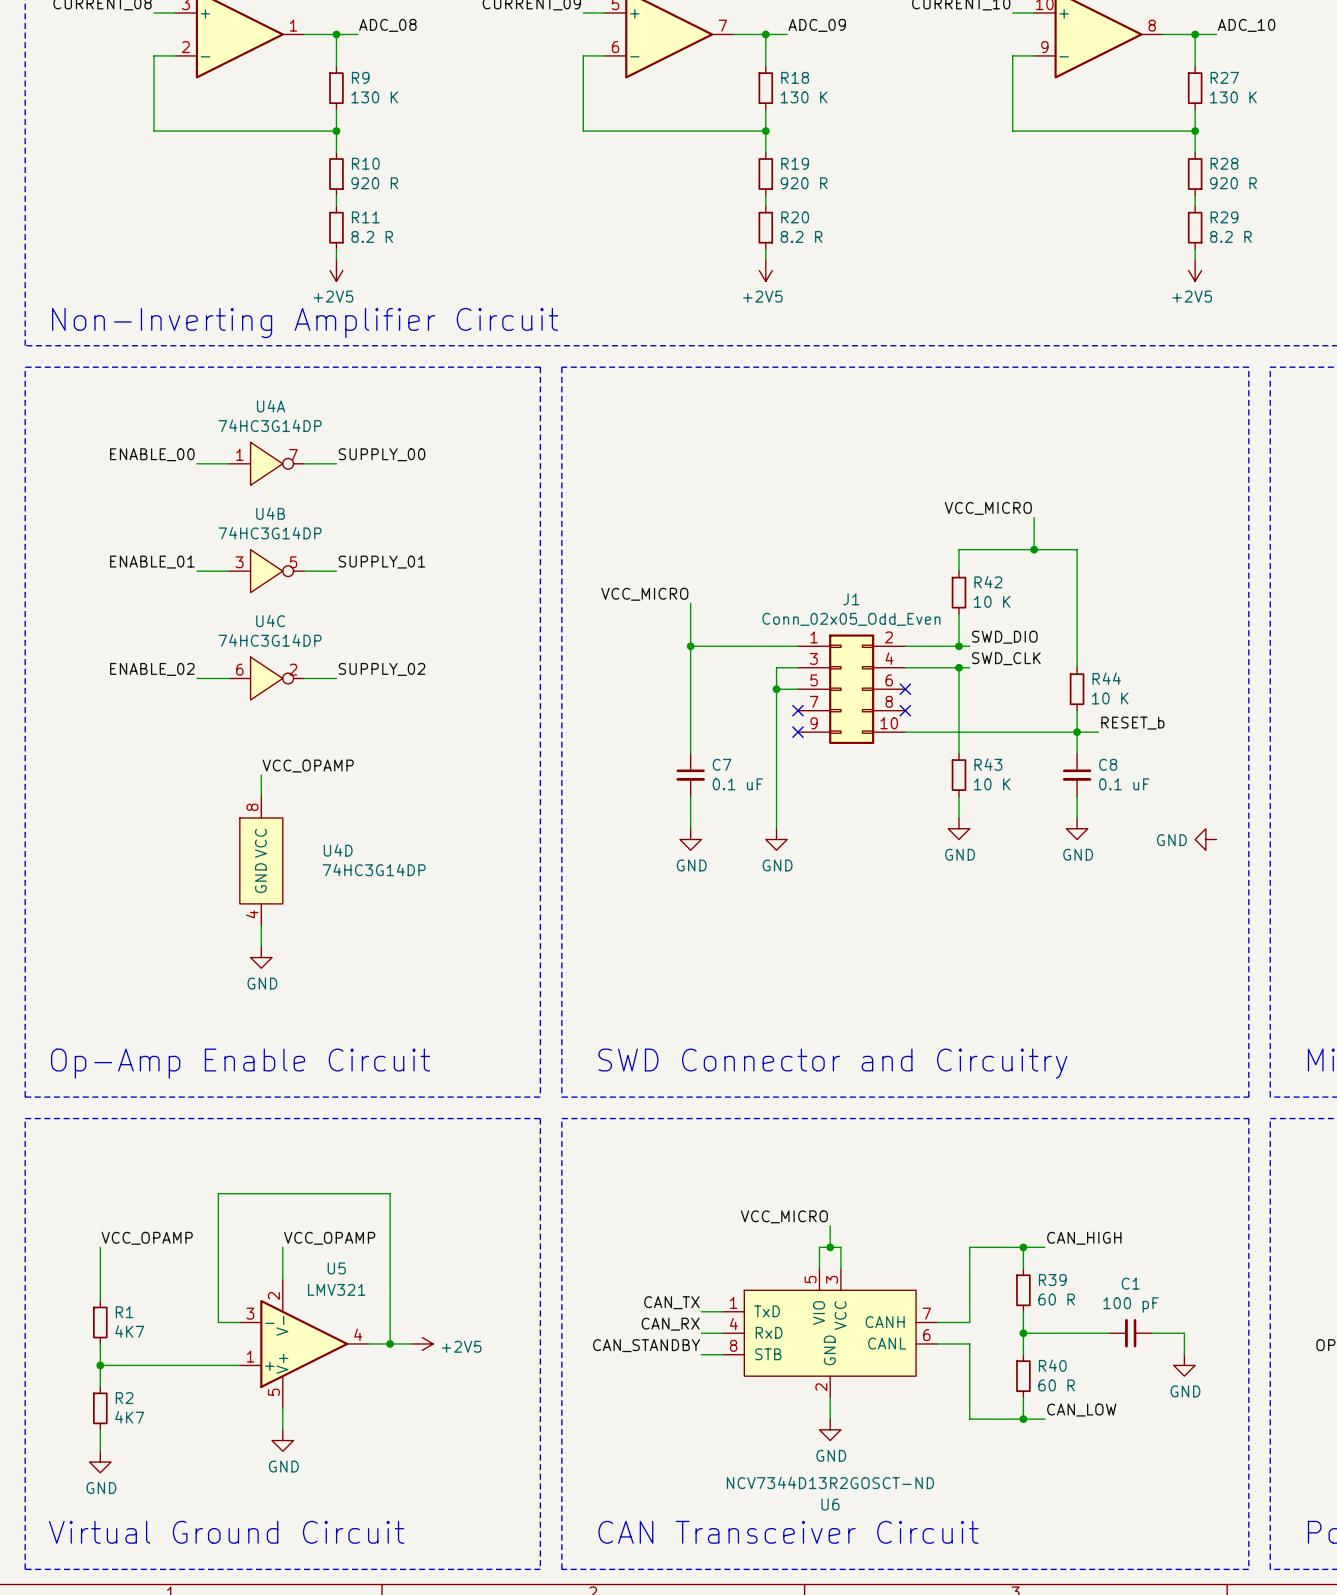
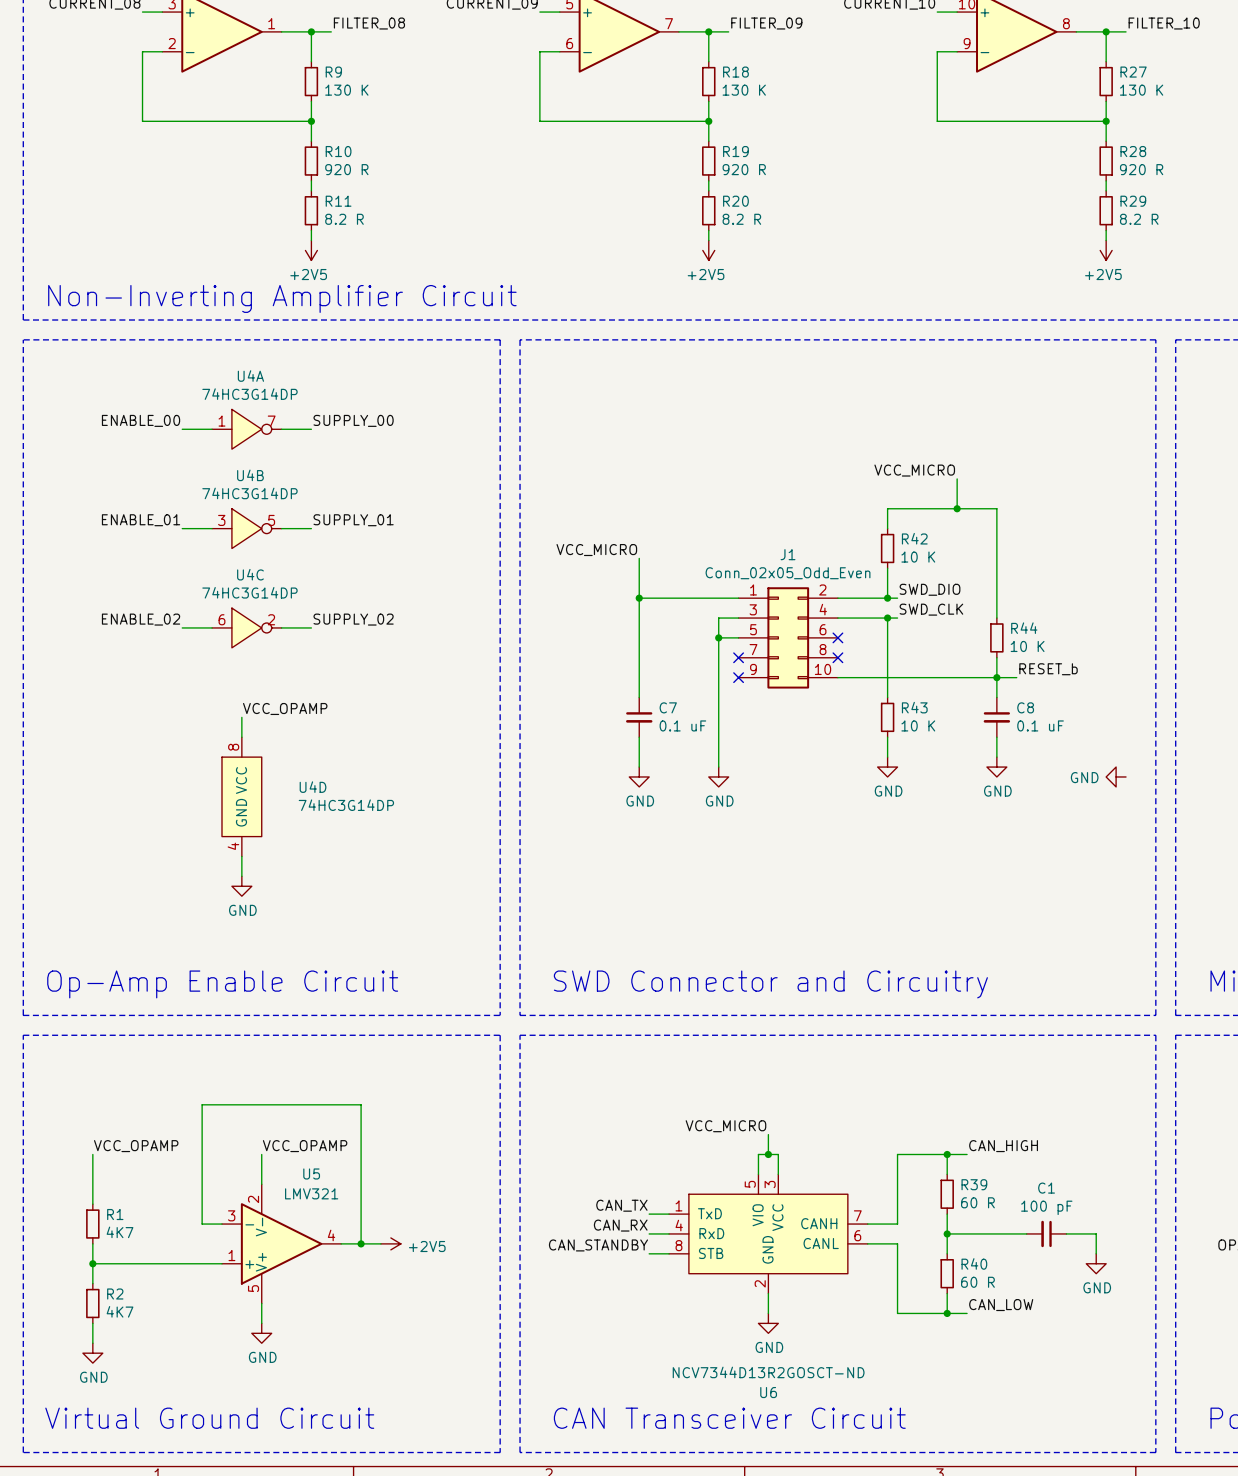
label: ADC_08 (387, 25) -> FILTER_08 (369, 23)
label: ADC_09 (817, 25) -> FILTER_09 (766, 23)
label: ADC_10 (1246, 25) -> FILTER_10 (1164, 23)

